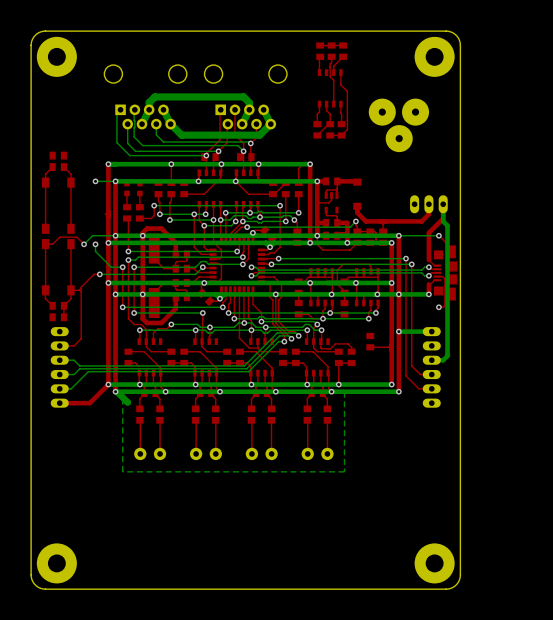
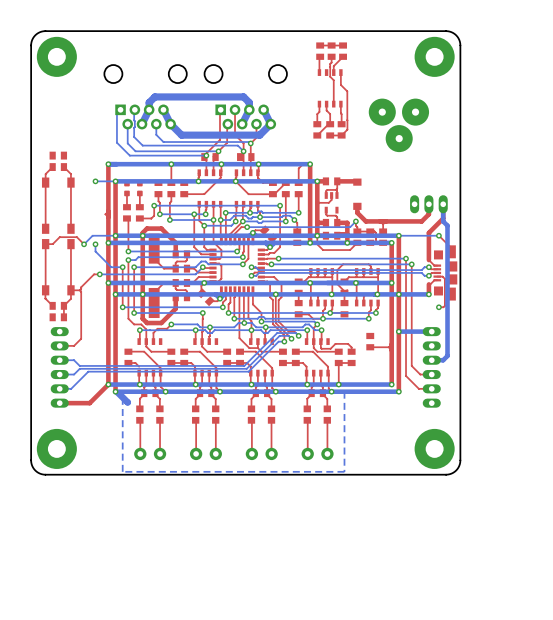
board edge: (460, 460) (460, 576) (456, 584) (446, 589) (41, 588) (35, 584) (31, 576) (31, 460) -> (460, 460) (456, 470) (446, 474) (45, 474) (35, 470) (31, 460)
part position: (56, 563) -> (56, 448)
part position: (434, 563) -> (434, 448)

